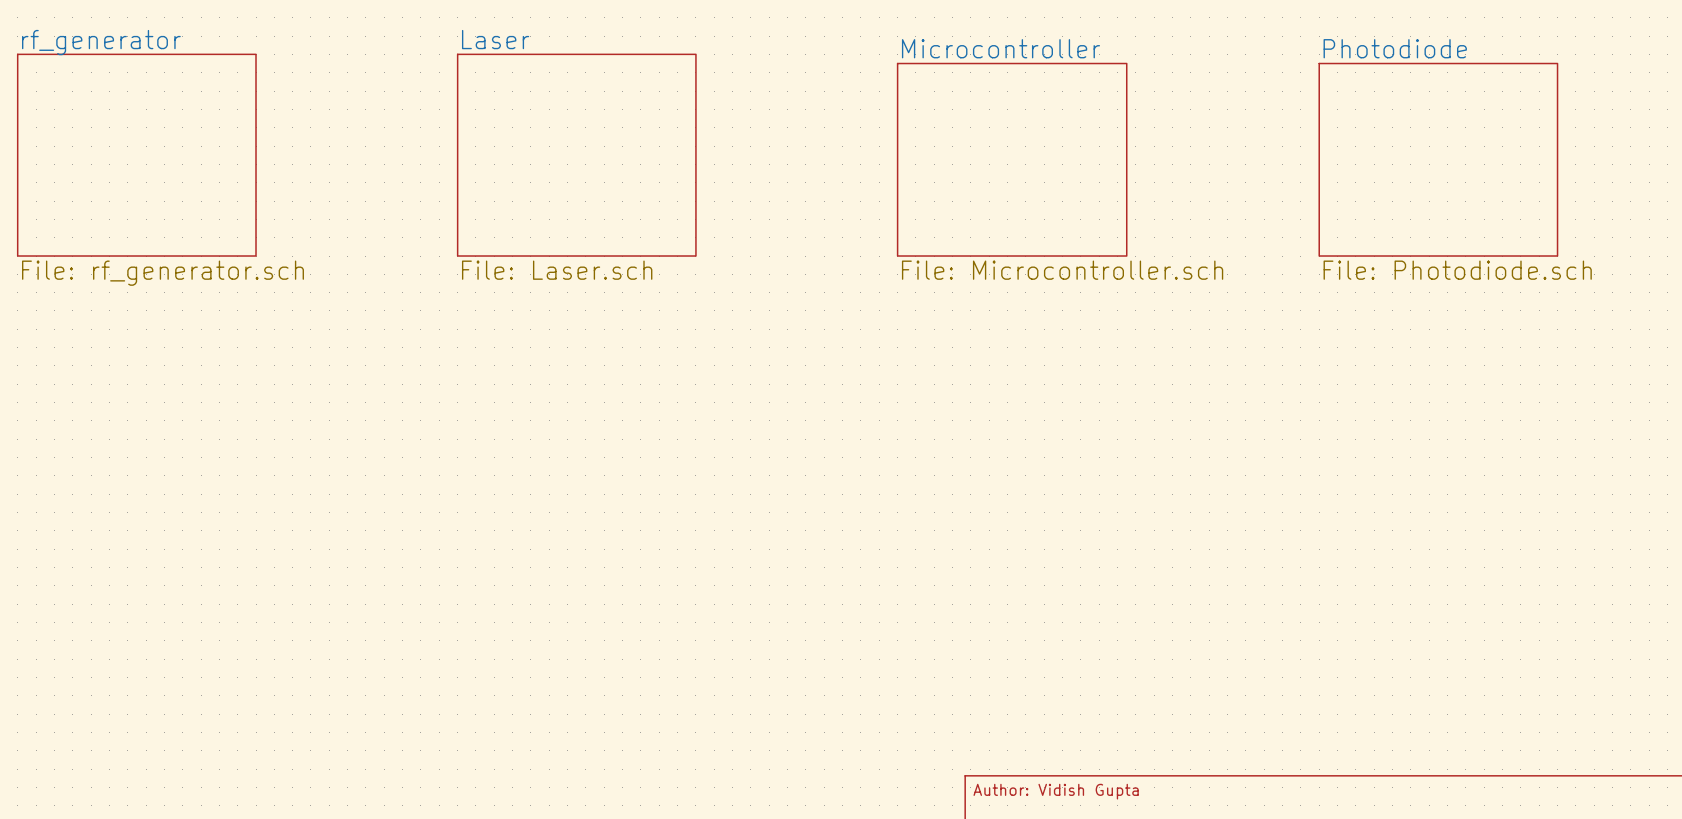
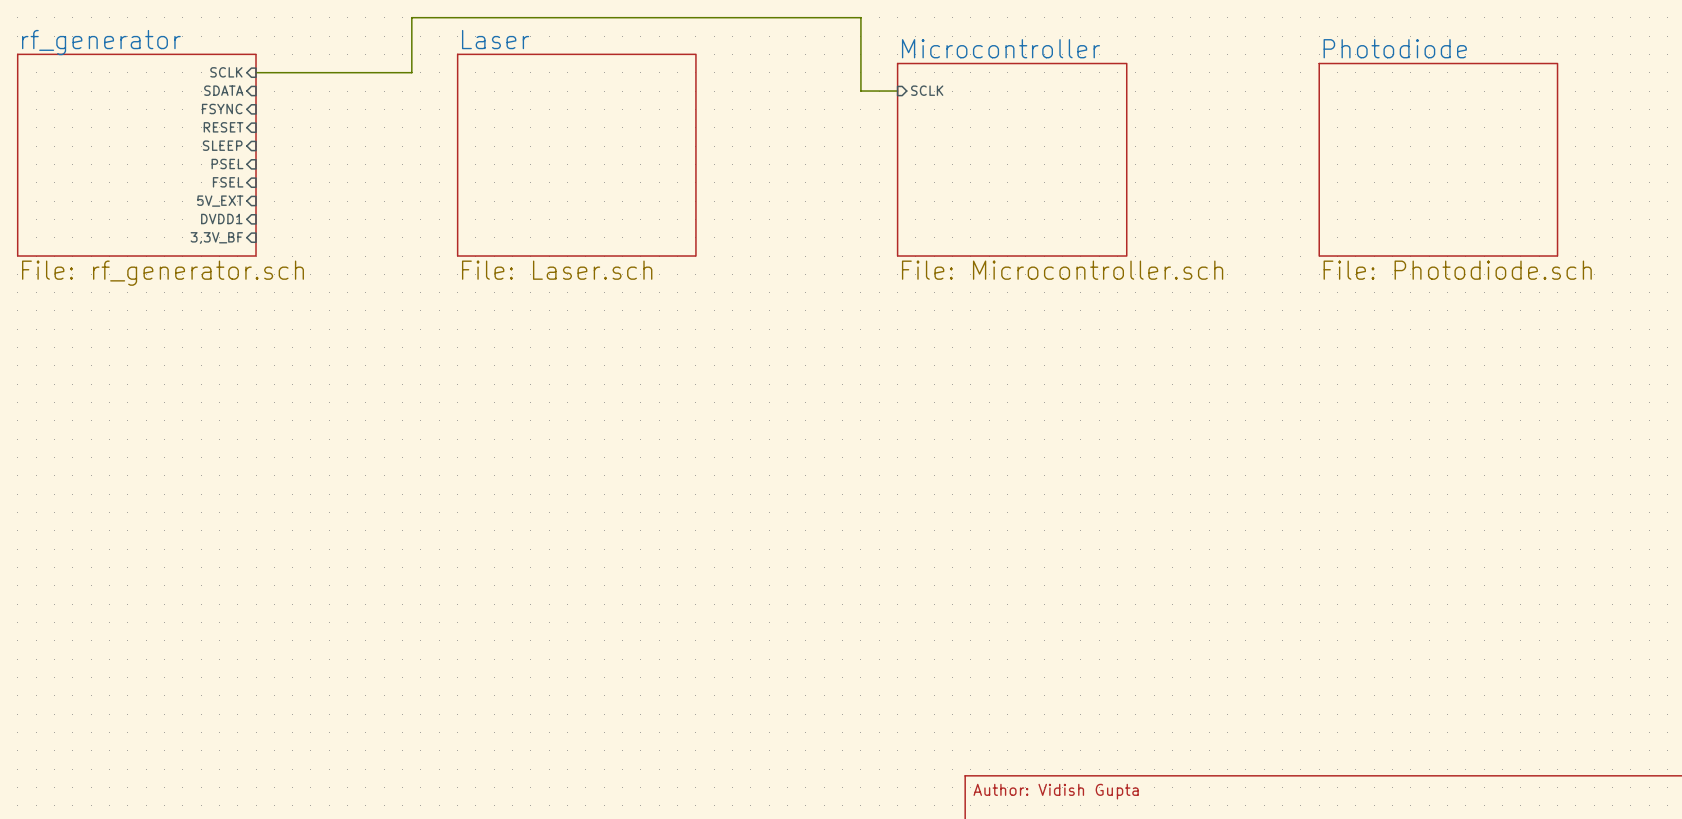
sheet pin: none -> SCLK (226, 72)
wire: none -> (256, 72) (411, 72) (411, 17) (860, 17) (860, 91) (897, 91)
sheet pin: none -> SDATA (223, 90)
sheet pin: none -> SCLK (927, 90)
sheet pin: none -> FSYNC (222, 109)
sheet pin: none -> RESET (223, 127)
sheet pin: none -> SLEEP (222, 145)
sheet pin: none -> PSEL (227, 164)
sheet pin: none -> FSEL (228, 182)
sheet pin: none -> 5V_EXT (220, 201)
sheet pin: none -> DVDD1 (221, 218)
sheet pin: none -> 3,3V_BF (216, 237)

